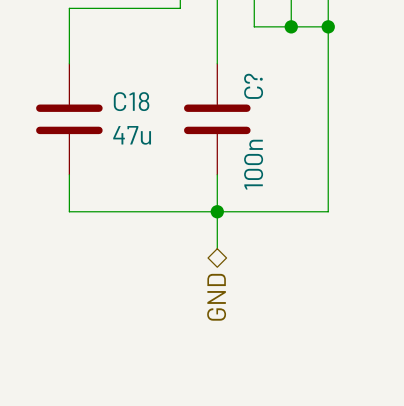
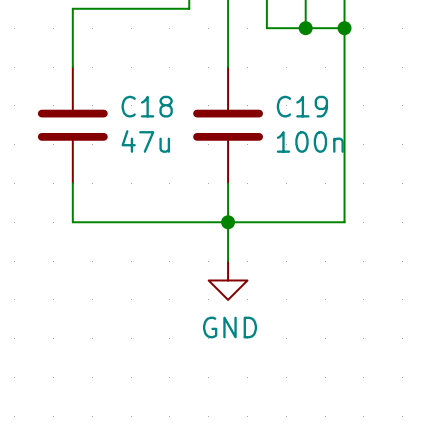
C? name: C? (253, 86) -> C19 (302, 106)
C? value rotation: 0° (253, 164) -> 90° clockwise (310, 141)
power symbol: none -> GND (228, 280)
hierarchical label: GND (216, 297) -> none

